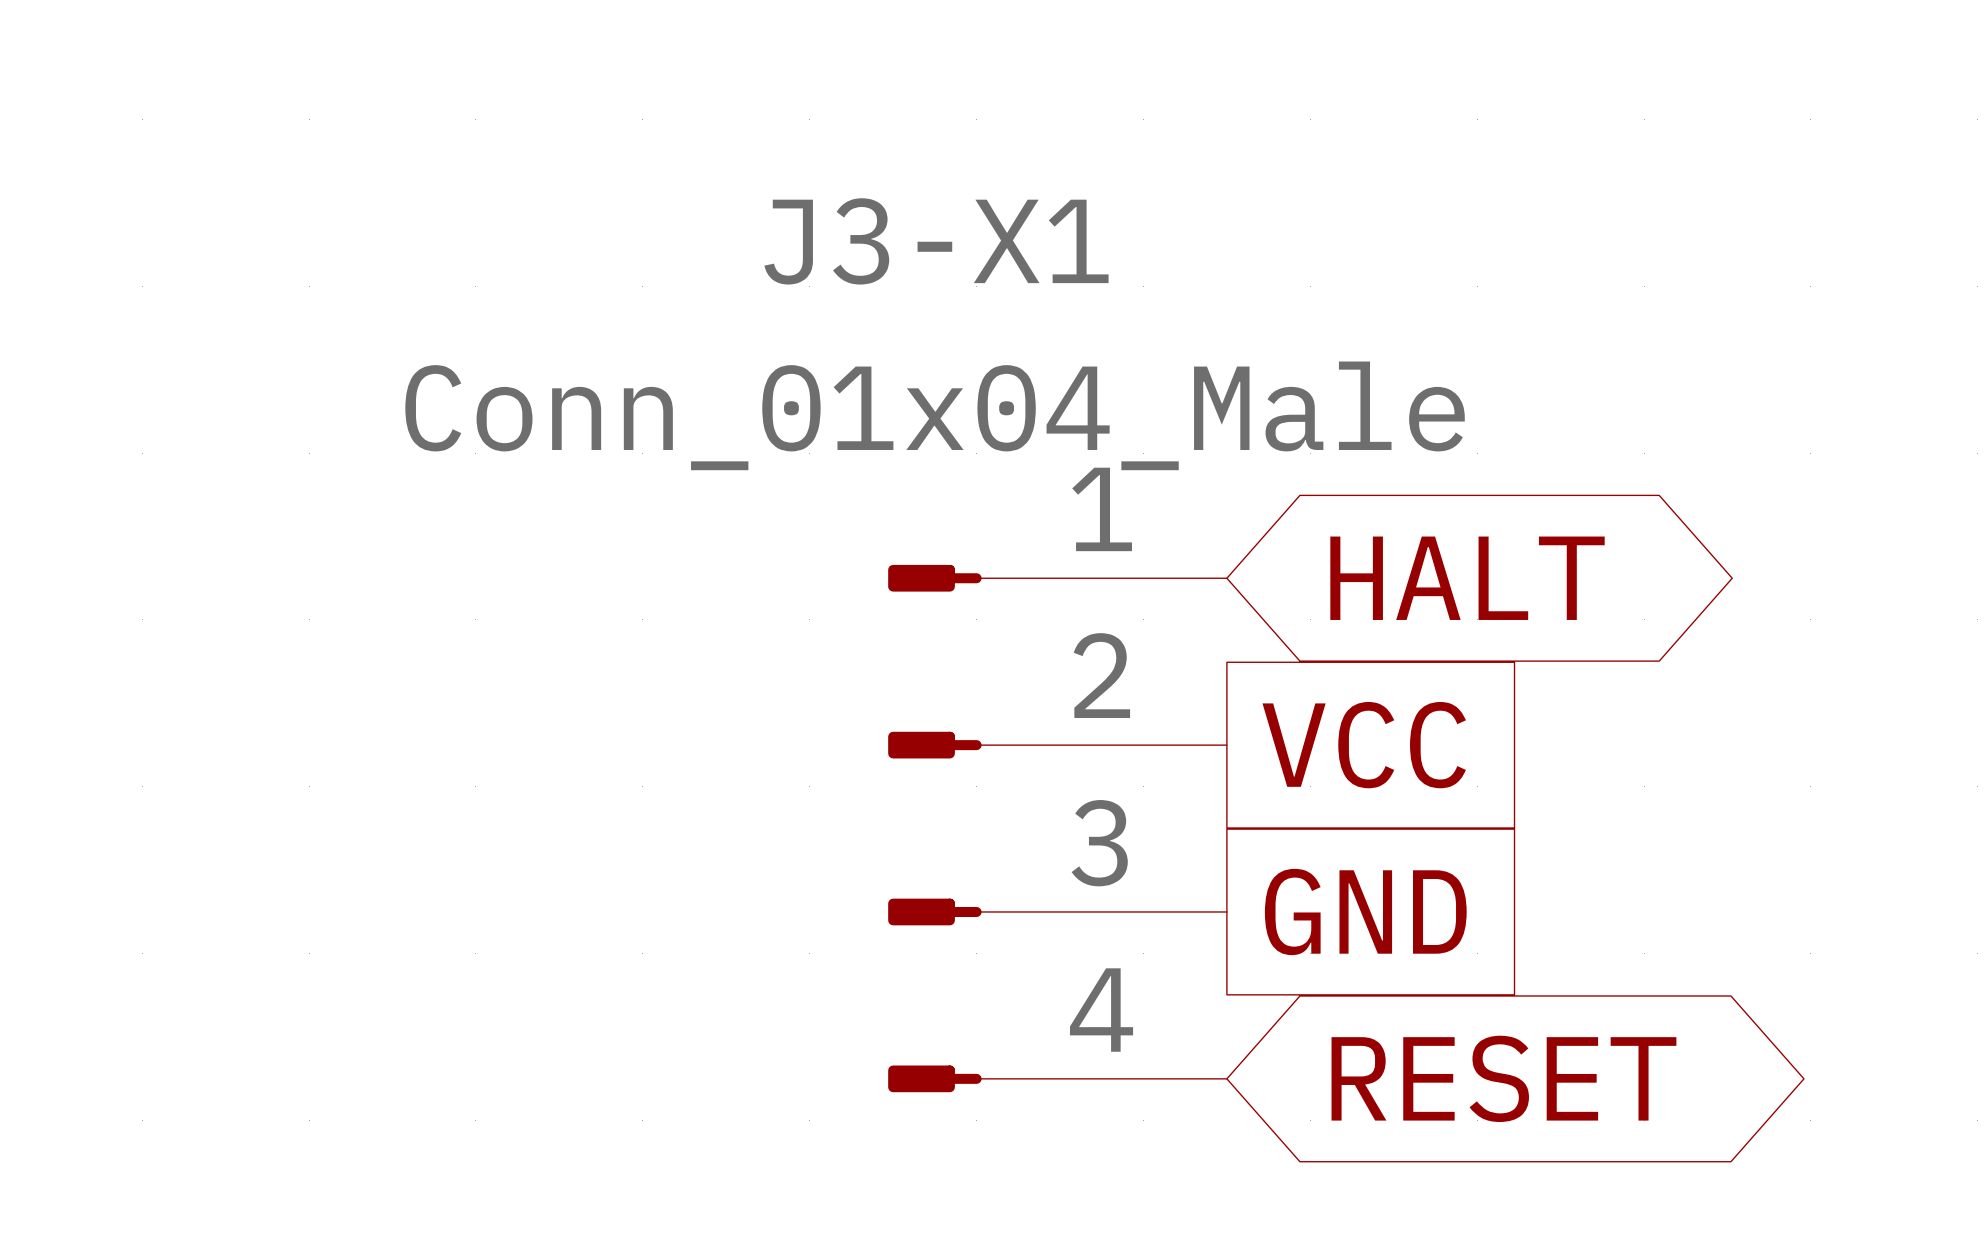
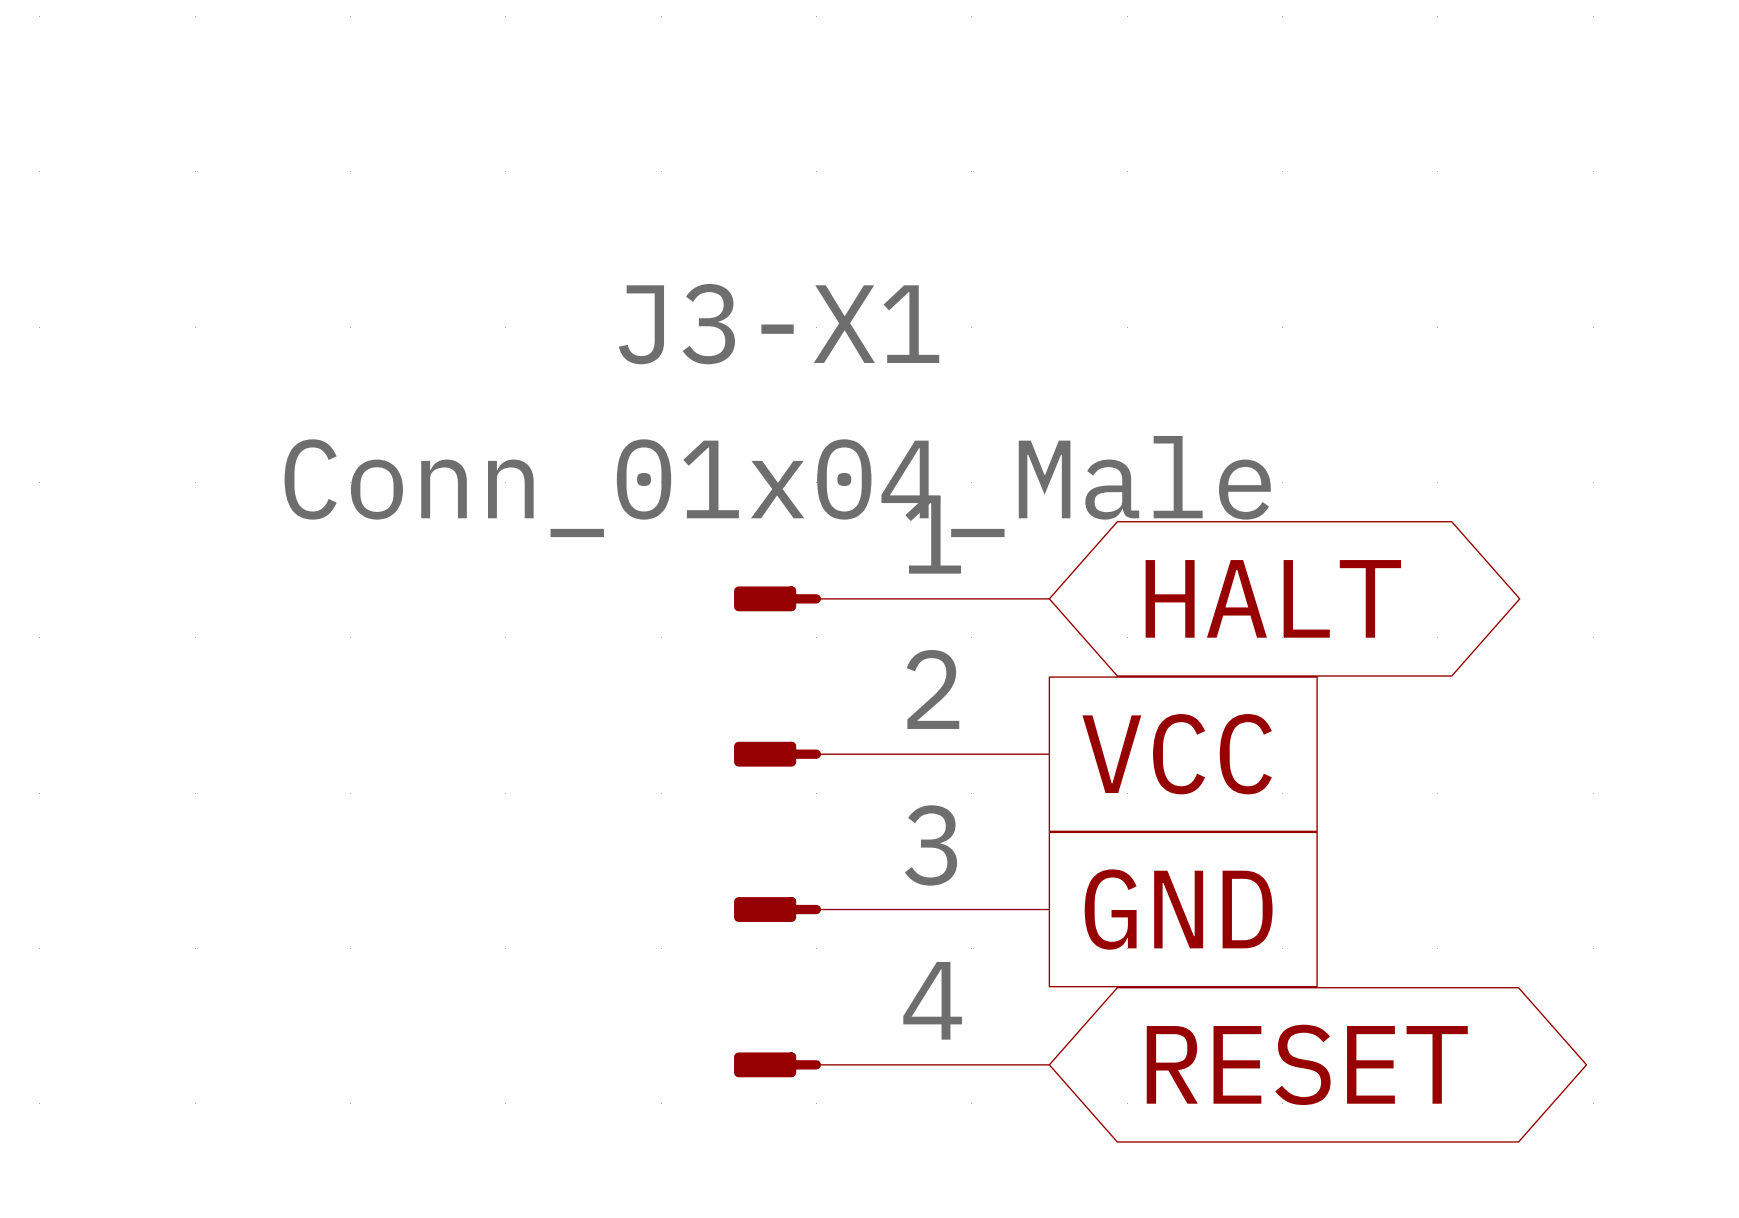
J3-X1 name position: J3-X1 (936, 241) -> J3-X1 (779, 324)
J3-X1 value position: Conn_01x04_Male (935, 415) -> Conn_01x04_Male (777, 486)

